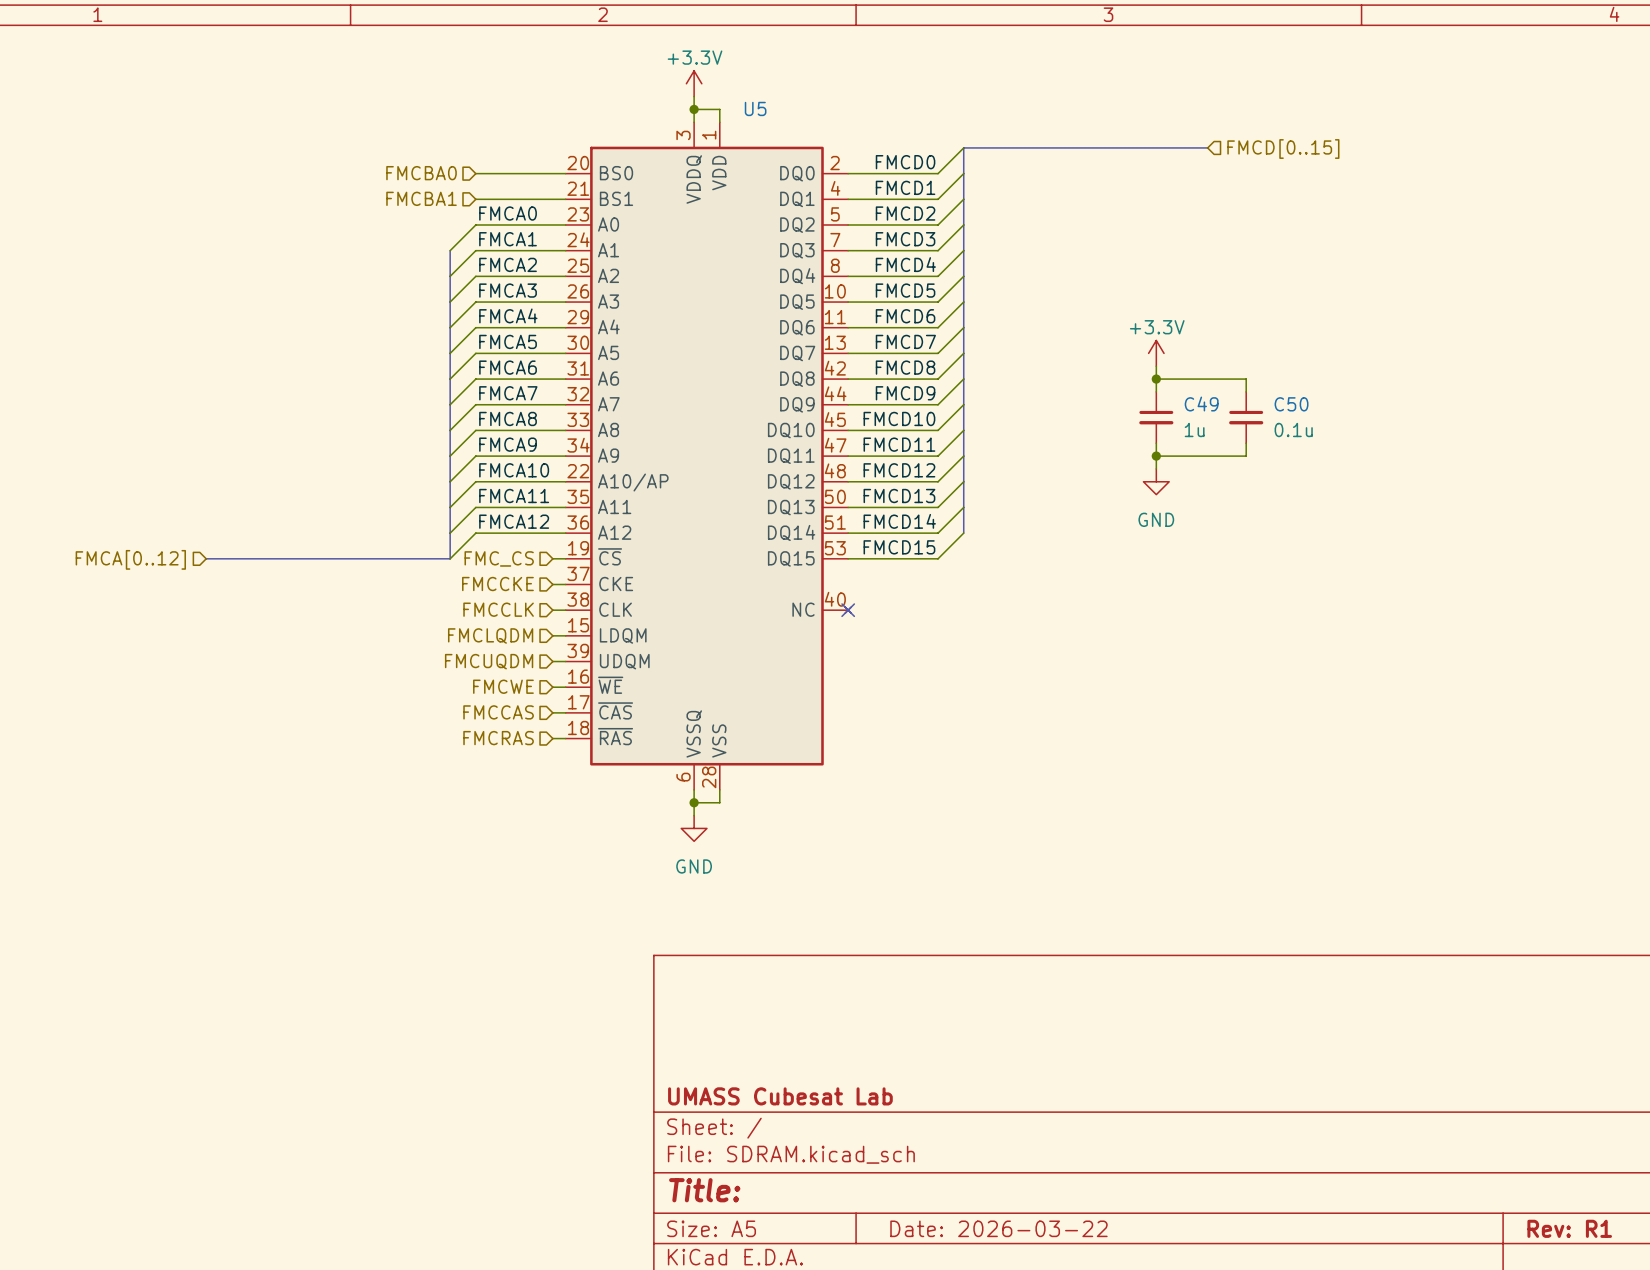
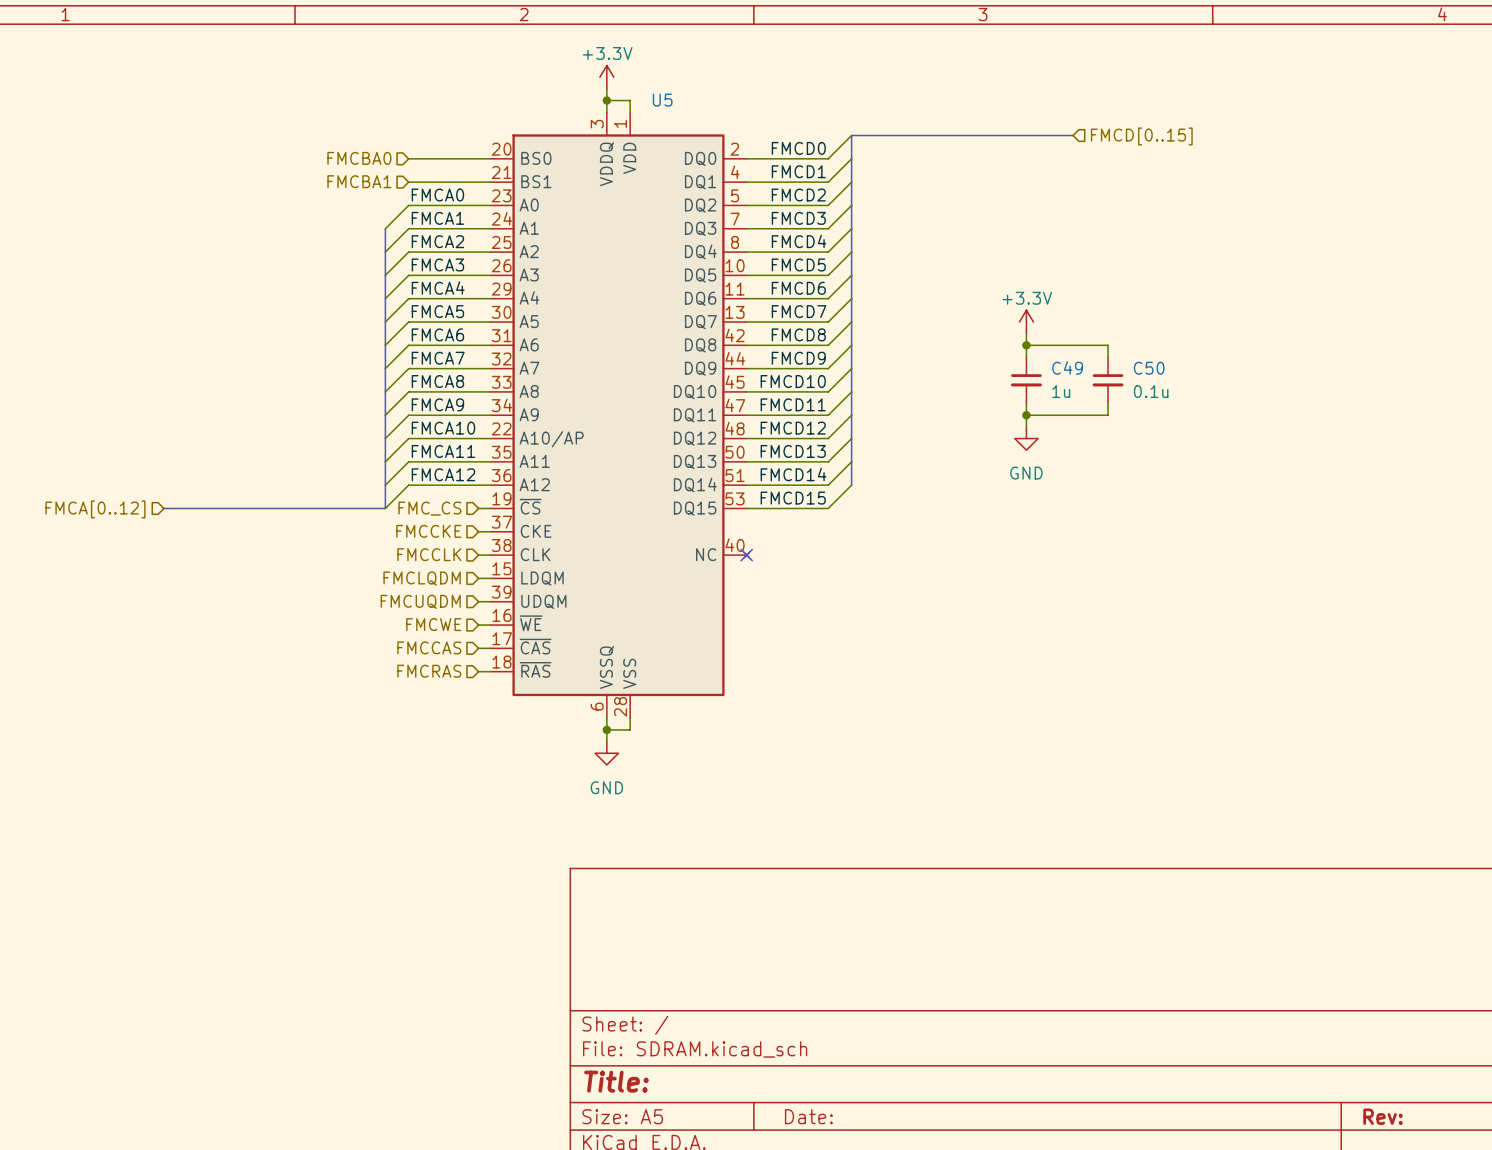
title block: UMASS Cubesat Lab (780, 1096) -> none
title block: Date: 2026-03-22 (998, 1228) -> Date: (808, 1116)
title block: Rev: R1 (1569, 1228) -> Rev: (1383, 1116)

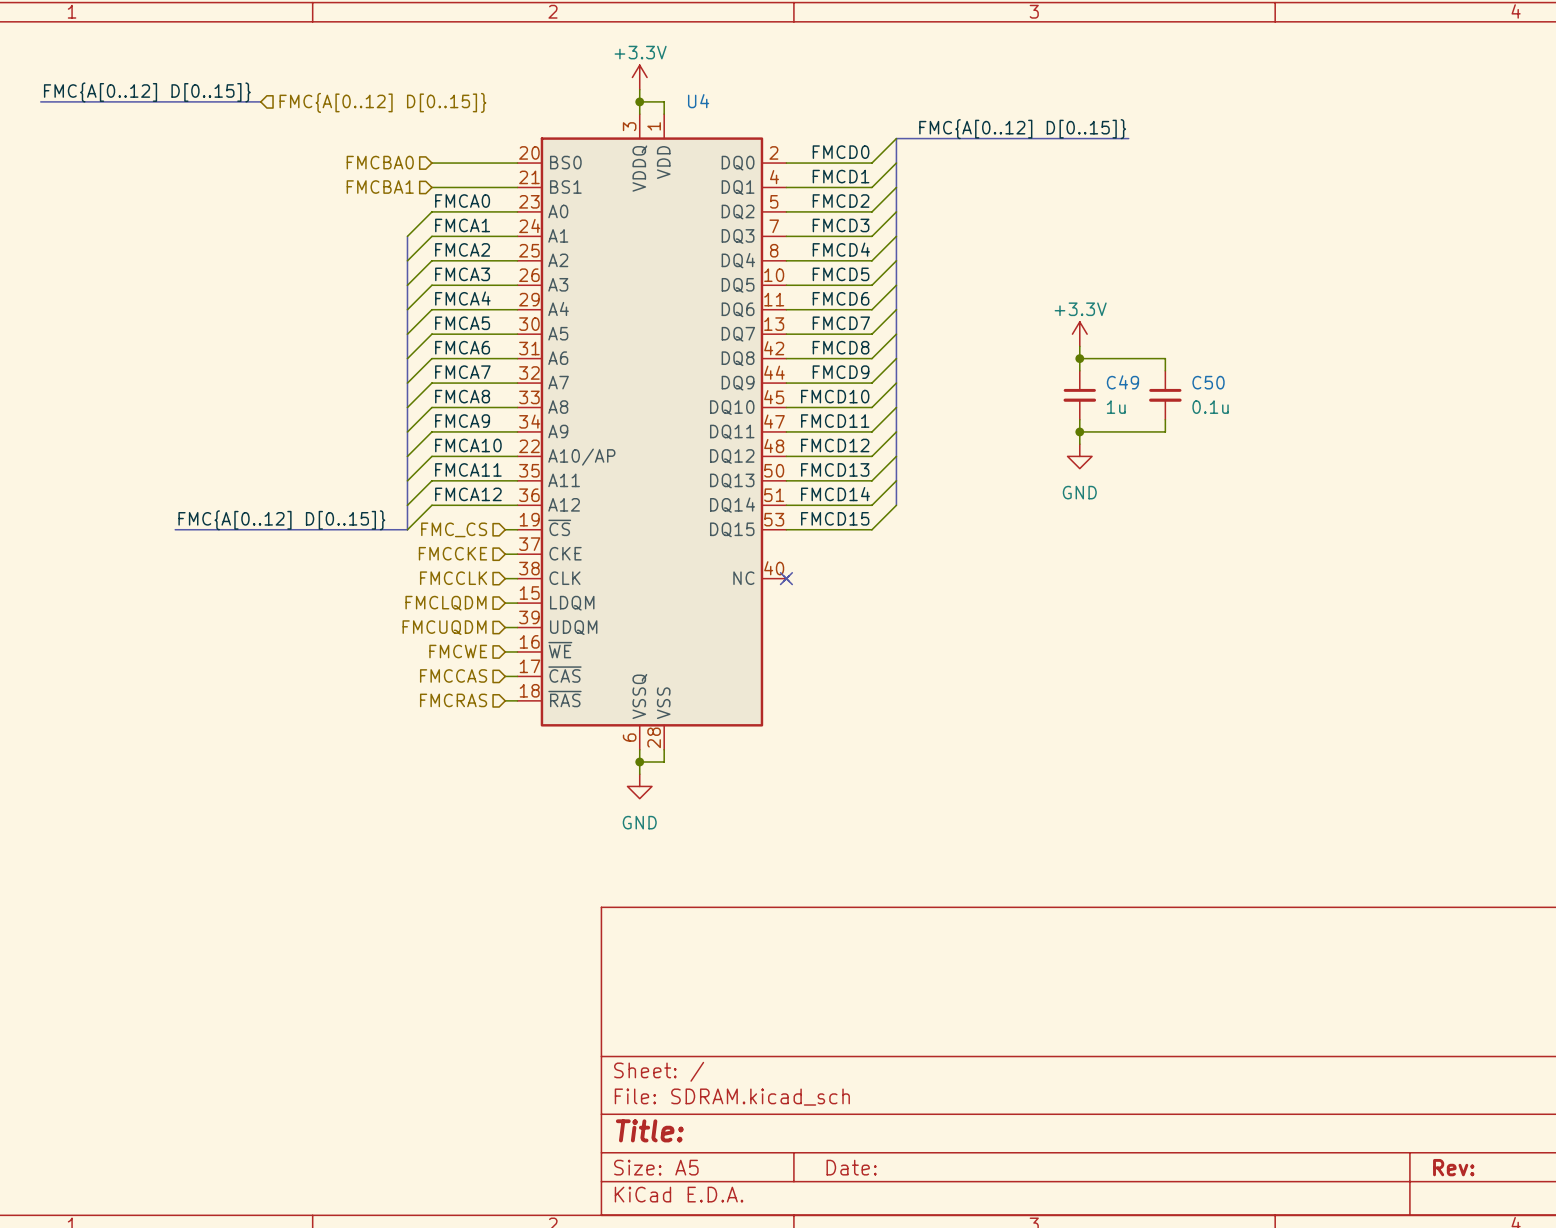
label: none -> FMC{A[0..12] D[0..15]} (147, 92)
bus: none -> (40, 101) (260, 101)
U5 name: U5 (662, 100) -> U4 (698, 101)
hierarchical label: none -> FMC{A[0..12] D[0..15]} (382, 102)
label: none -> FMC{A[0..12] D[0..15]} (1022, 129)
hierarchical label: FMCD[0..15] (1141, 136) -> none
label: none -> FMC{A[0..12] D[0..15]} (281, 520)
hierarchical label: FMCA[0..12] (95, 509) -> none

